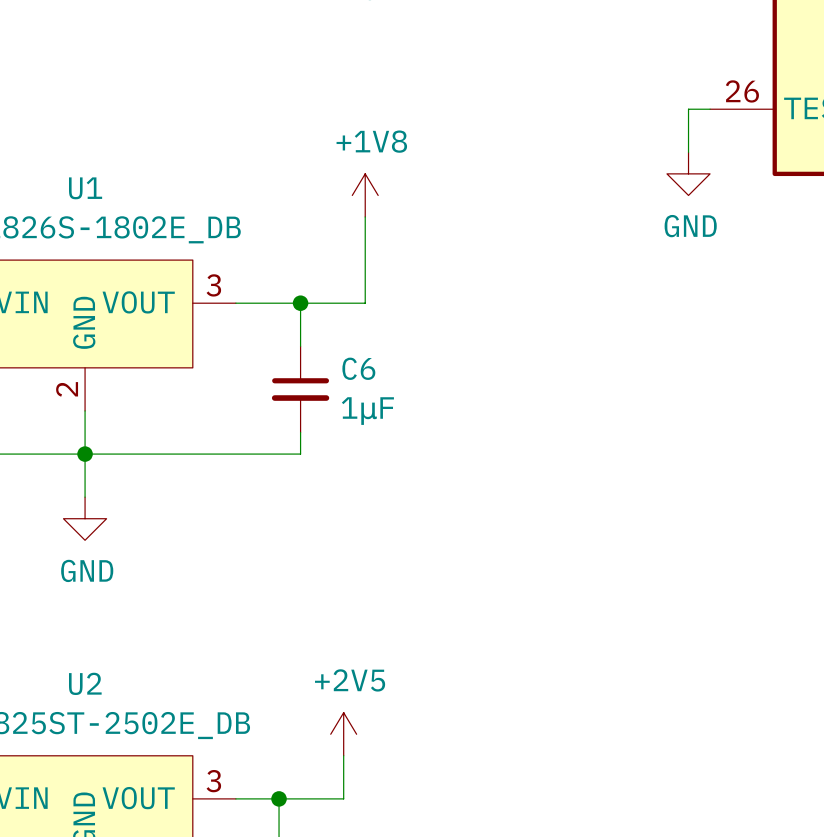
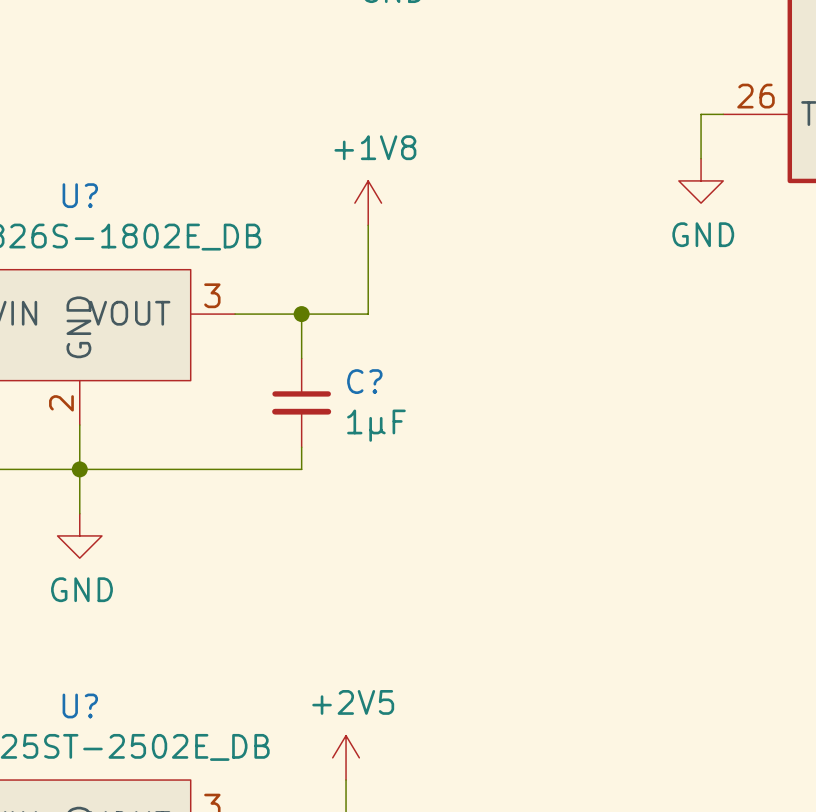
U1 name: U1 (85, 188) -> U? (80, 195)
C6 name: C6 (358, 368) -> C? (364, 381)
U2 name: U2 (85, 683) -> U? (80, 705)

